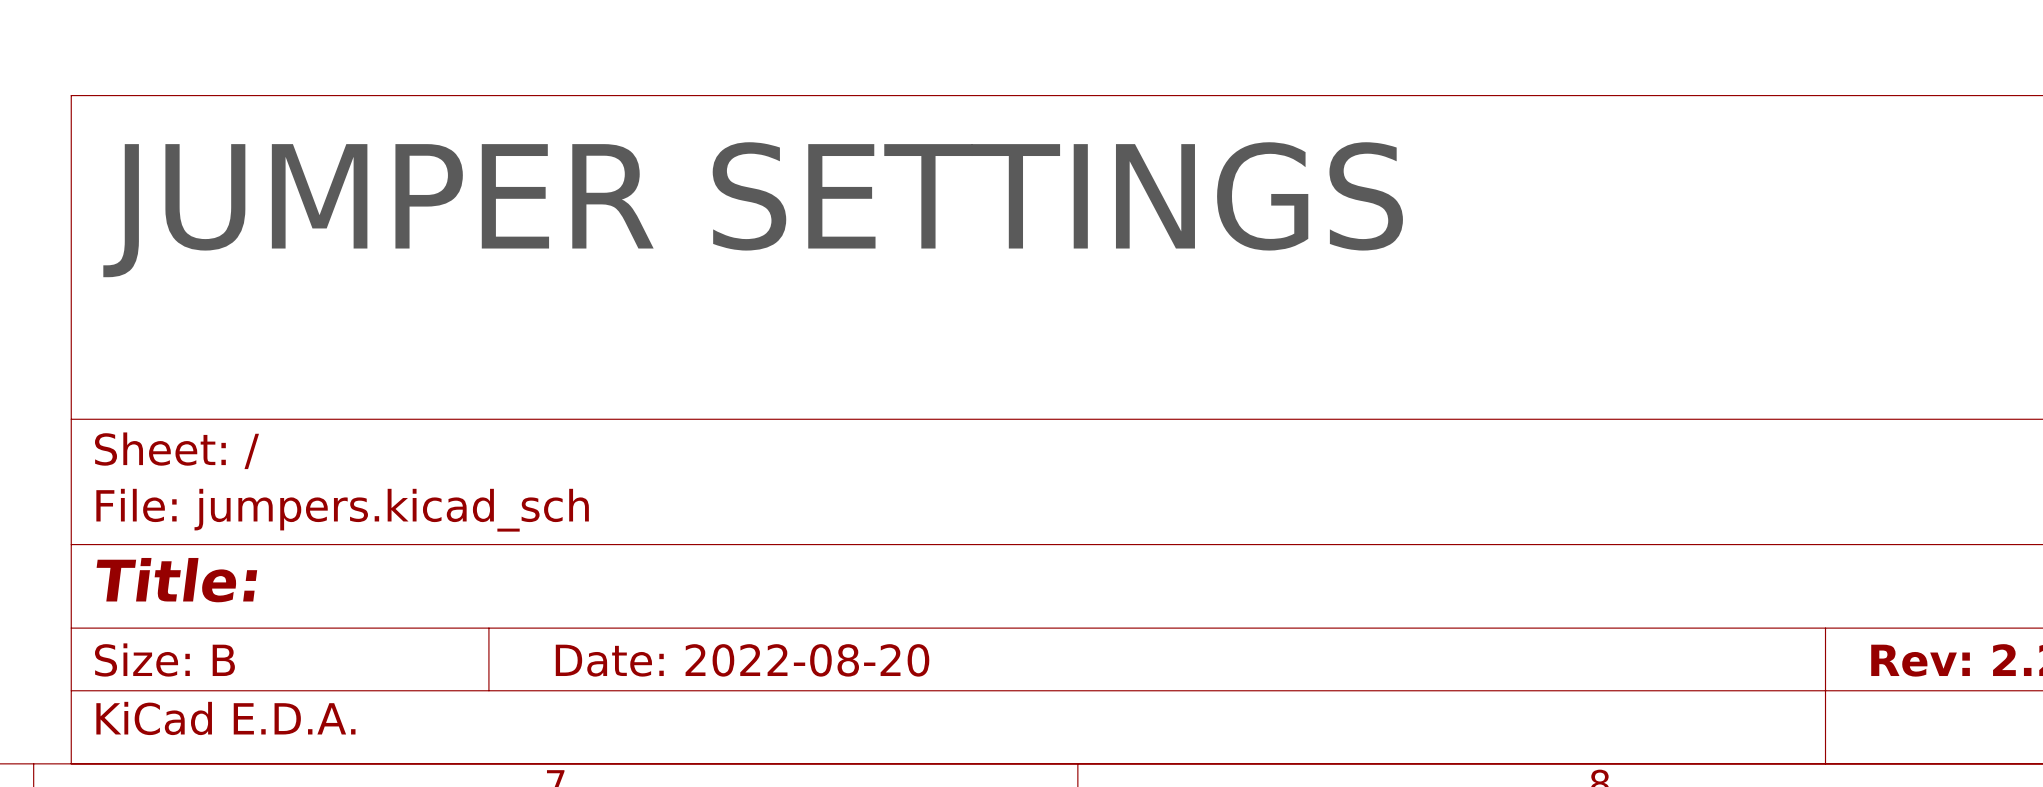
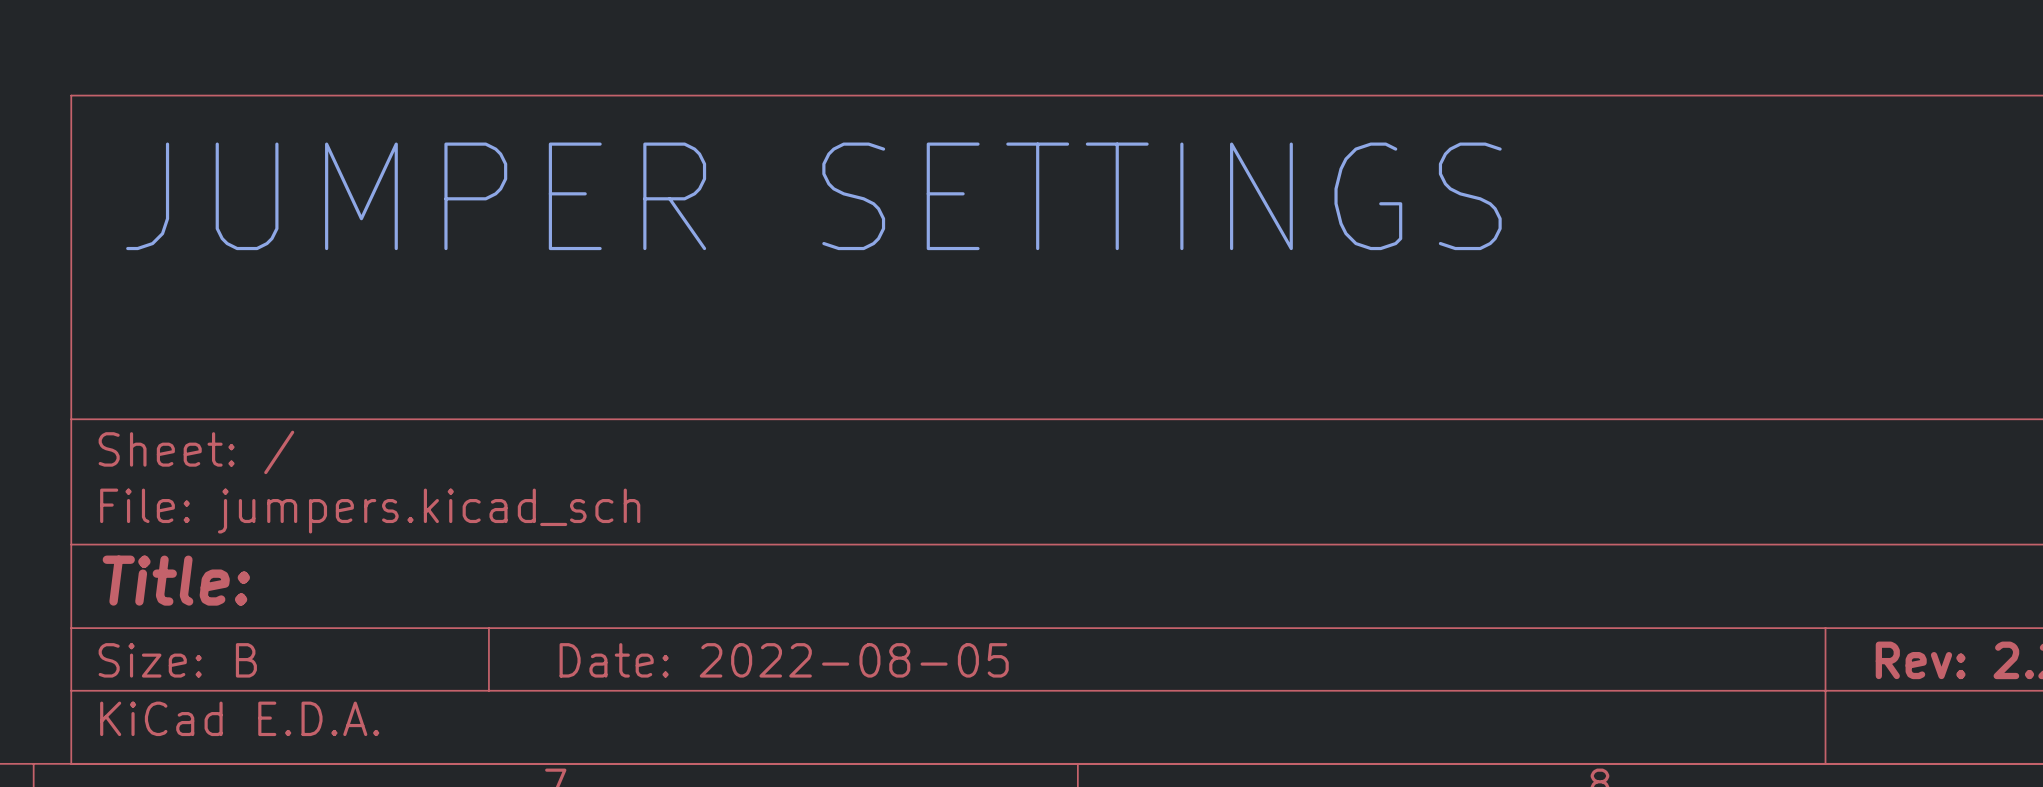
title block: Date: 2022-08-20 (742, 660) -> Date: 2022-08-05 (784, 660)

